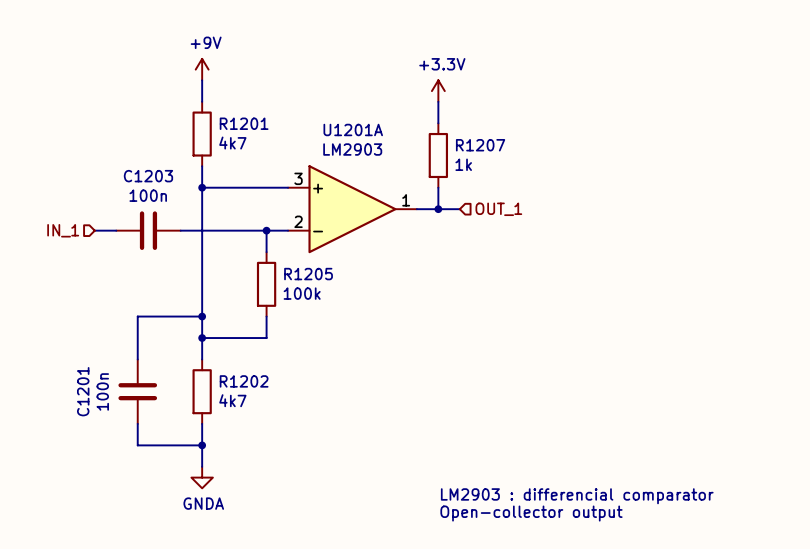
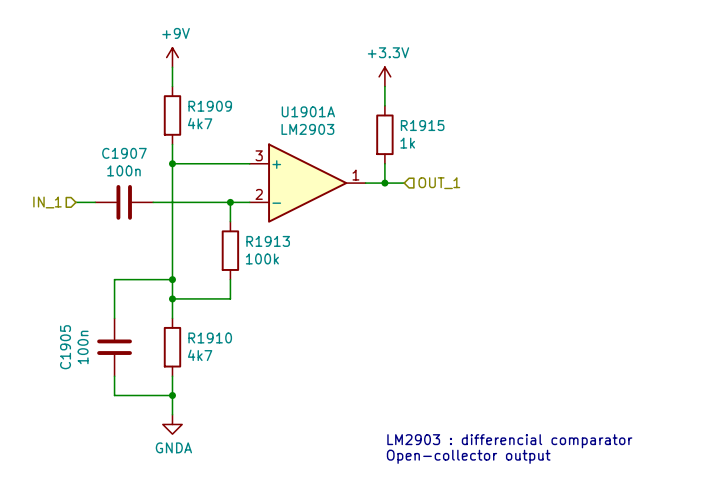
R1201 name: R1201 (244, 123) -> R1909 (210, 106)
U1201A name: U1201A (353, 129) -> U1901A (308, 111)
R1207 name: R1207 (480, 145) -> R1915 (422, 125)
C1203 name: C1203 (148, 176) -> C1907 (124, 153)
R1205 name: R1205 (308, 274) -> R1913 (268, 241)
R1202 name: R1202 (244, 381) -> R1910 (210, 337)
C1201 name: C1201 (83, 391) -> C1905 (65, 347)

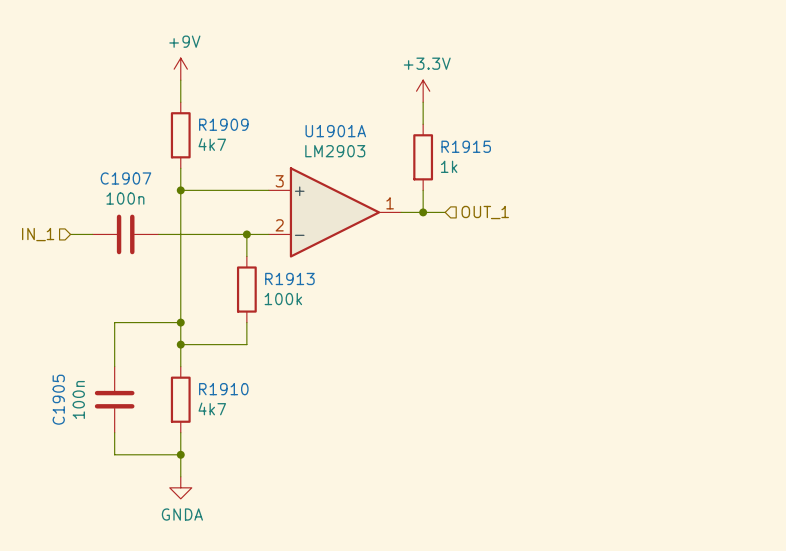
text: LM2903 : differencial comparator (509, 441) -> none
text: Open-collector output (468, 456) -> none

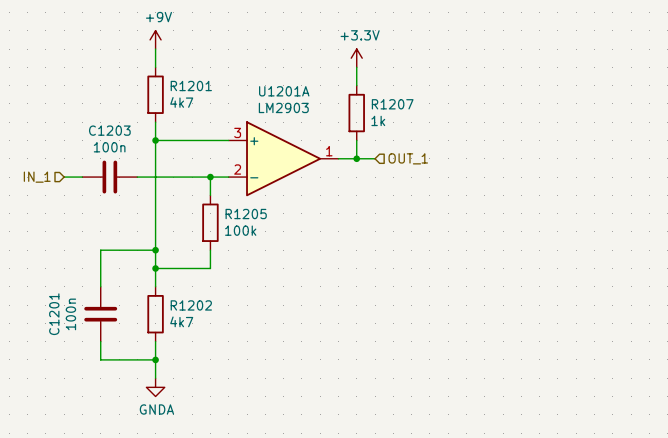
R1909 name: R1909 (223, 124) -> R1201 (191, 86)
U1901A name: U1901A (335, 131) -> U1201A (284, 91)
R1915 name: R1915 (466, 146) -> R1207 (392, 104)
C1907 name: C1907 (125, 178) -> C1203 (109, 130)
R1913 name: R1913 (289, 278) -> R1205 (246, 214)
R1910 name: R1910 (223, 389) -> R1202 (191, 305)
C1905 name: C1905 (58, 399) -> C1201 (54, 314)

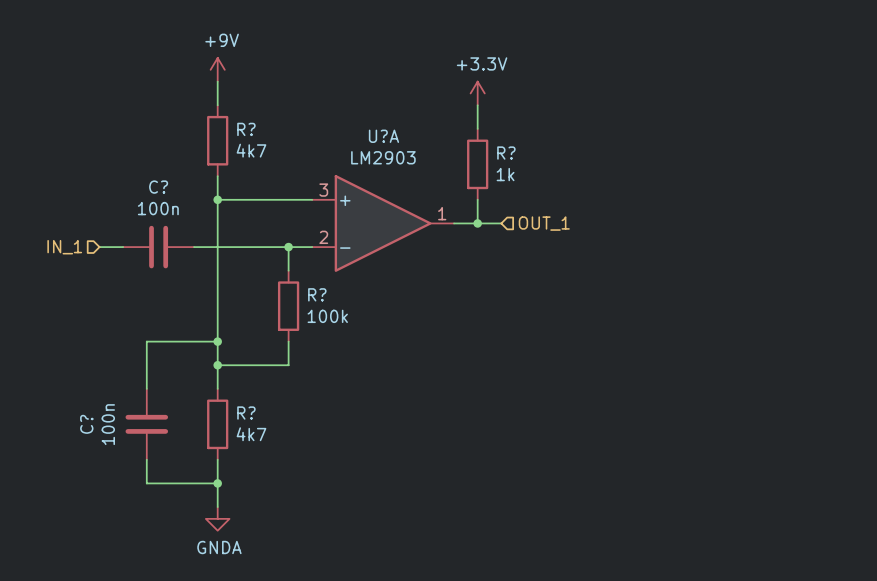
R1201 name: R1201 (191, 86) -> R? (246, 129)
U1201A name: U1201A (284, 91) -> U?A (383, 136)
R1207 name: R1207 (392, 104) -> R? (506, 153)
C1203 name: C1203 (109, 130) -> C? (158, 187)
R1205 name: R1205 (246, 214) -> R? (317, 294)
R1202 name: R1202 (191, 305) -> R? (246, 413)
C1201 name: C1201 (54, 314) -> C? (86, 424)

